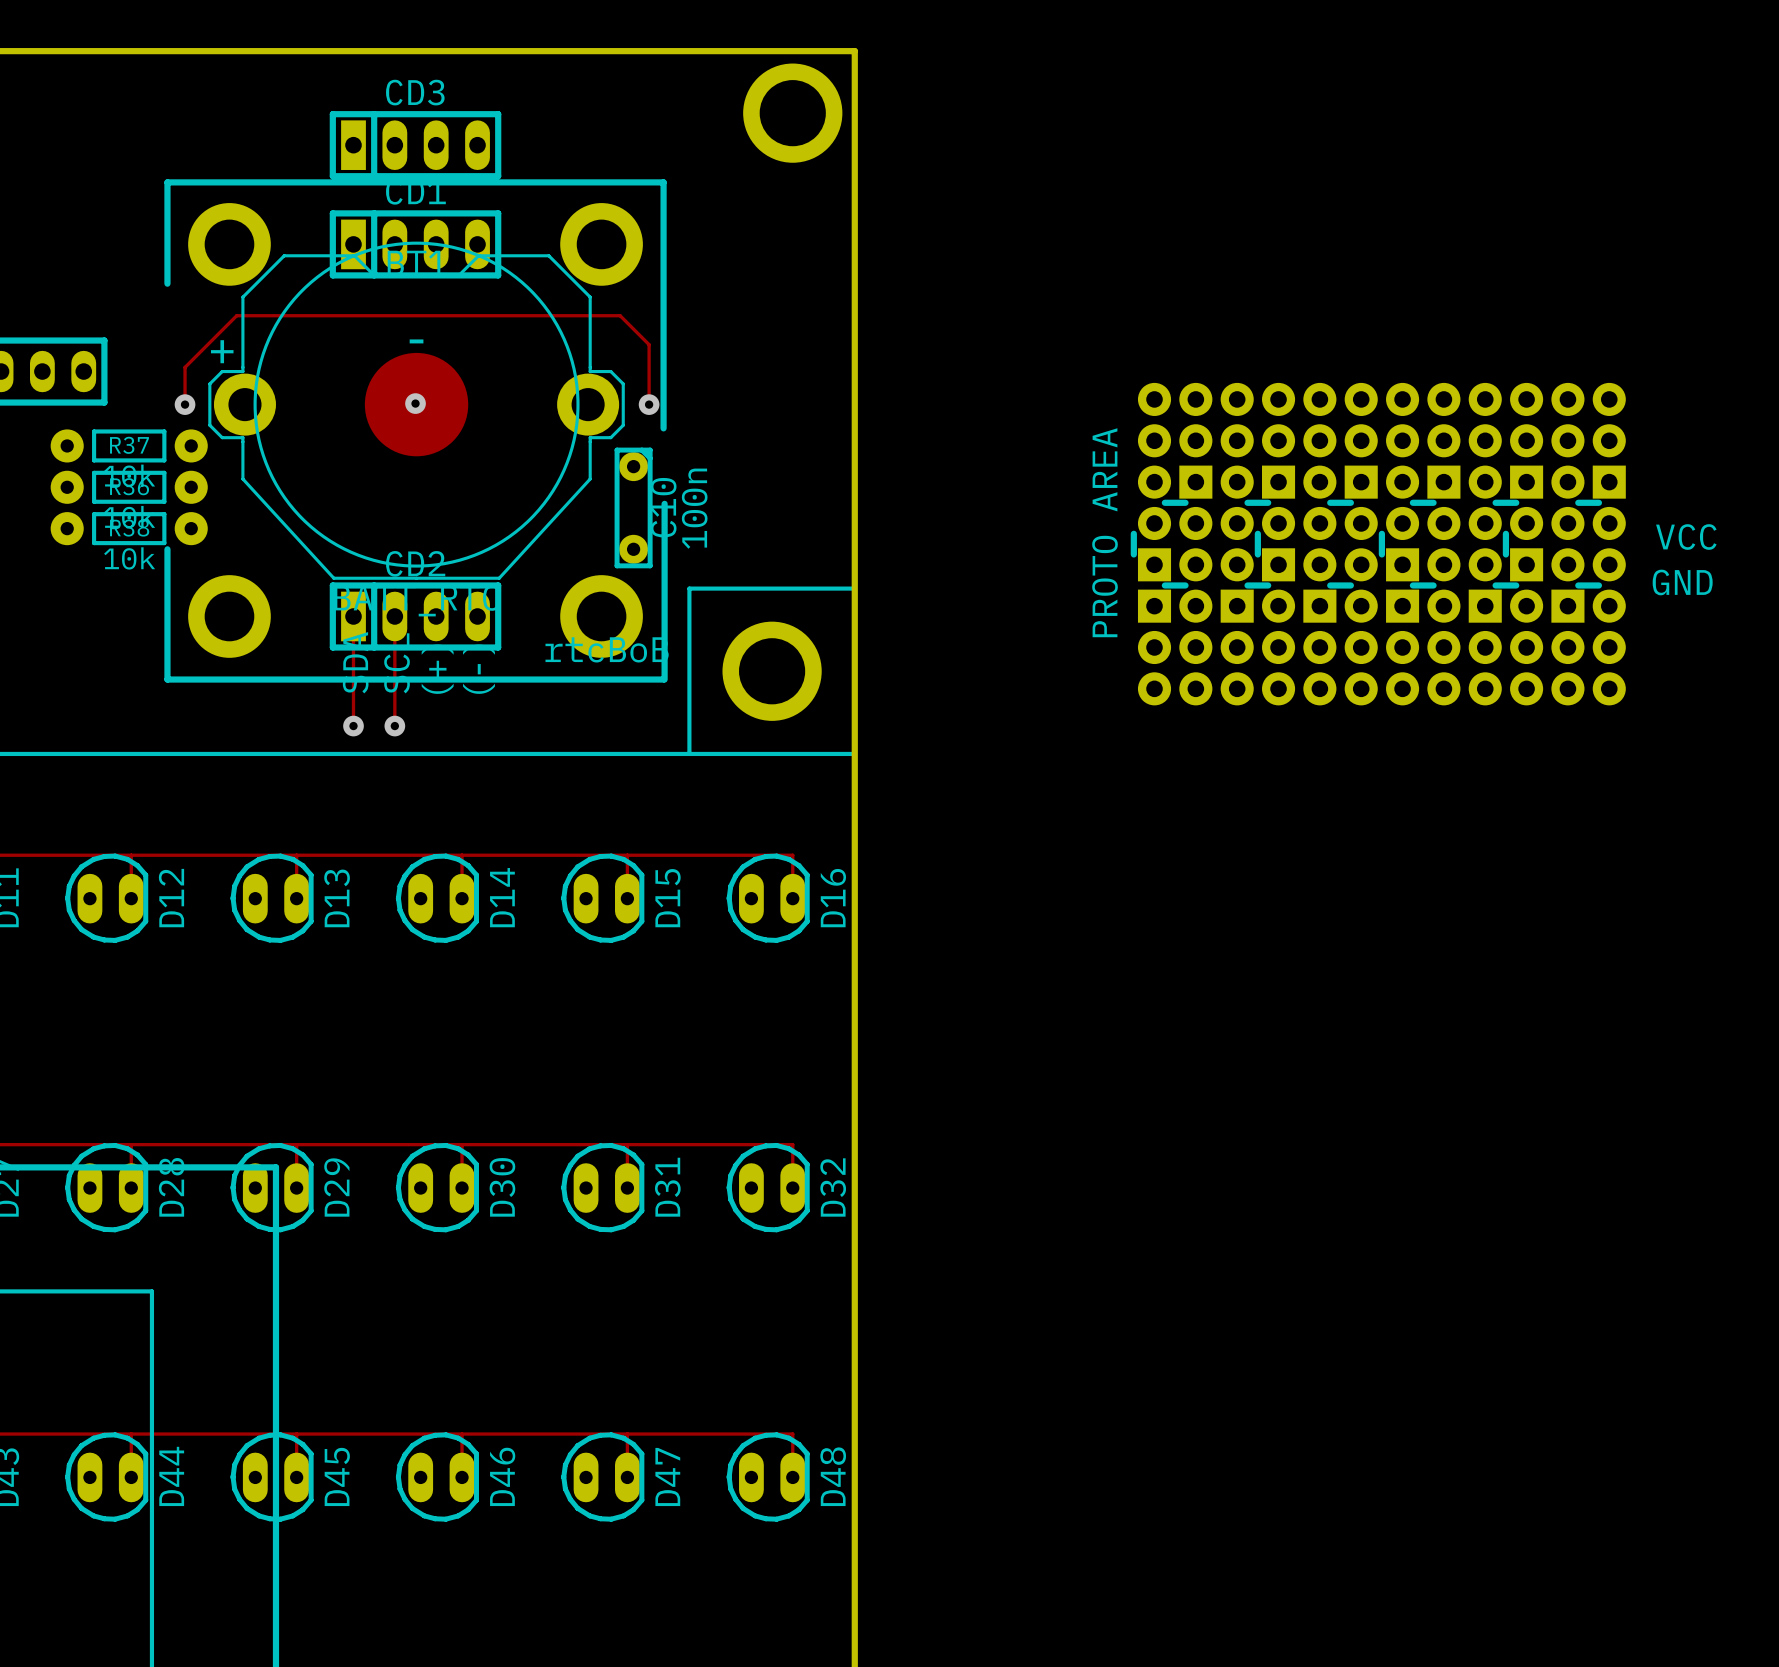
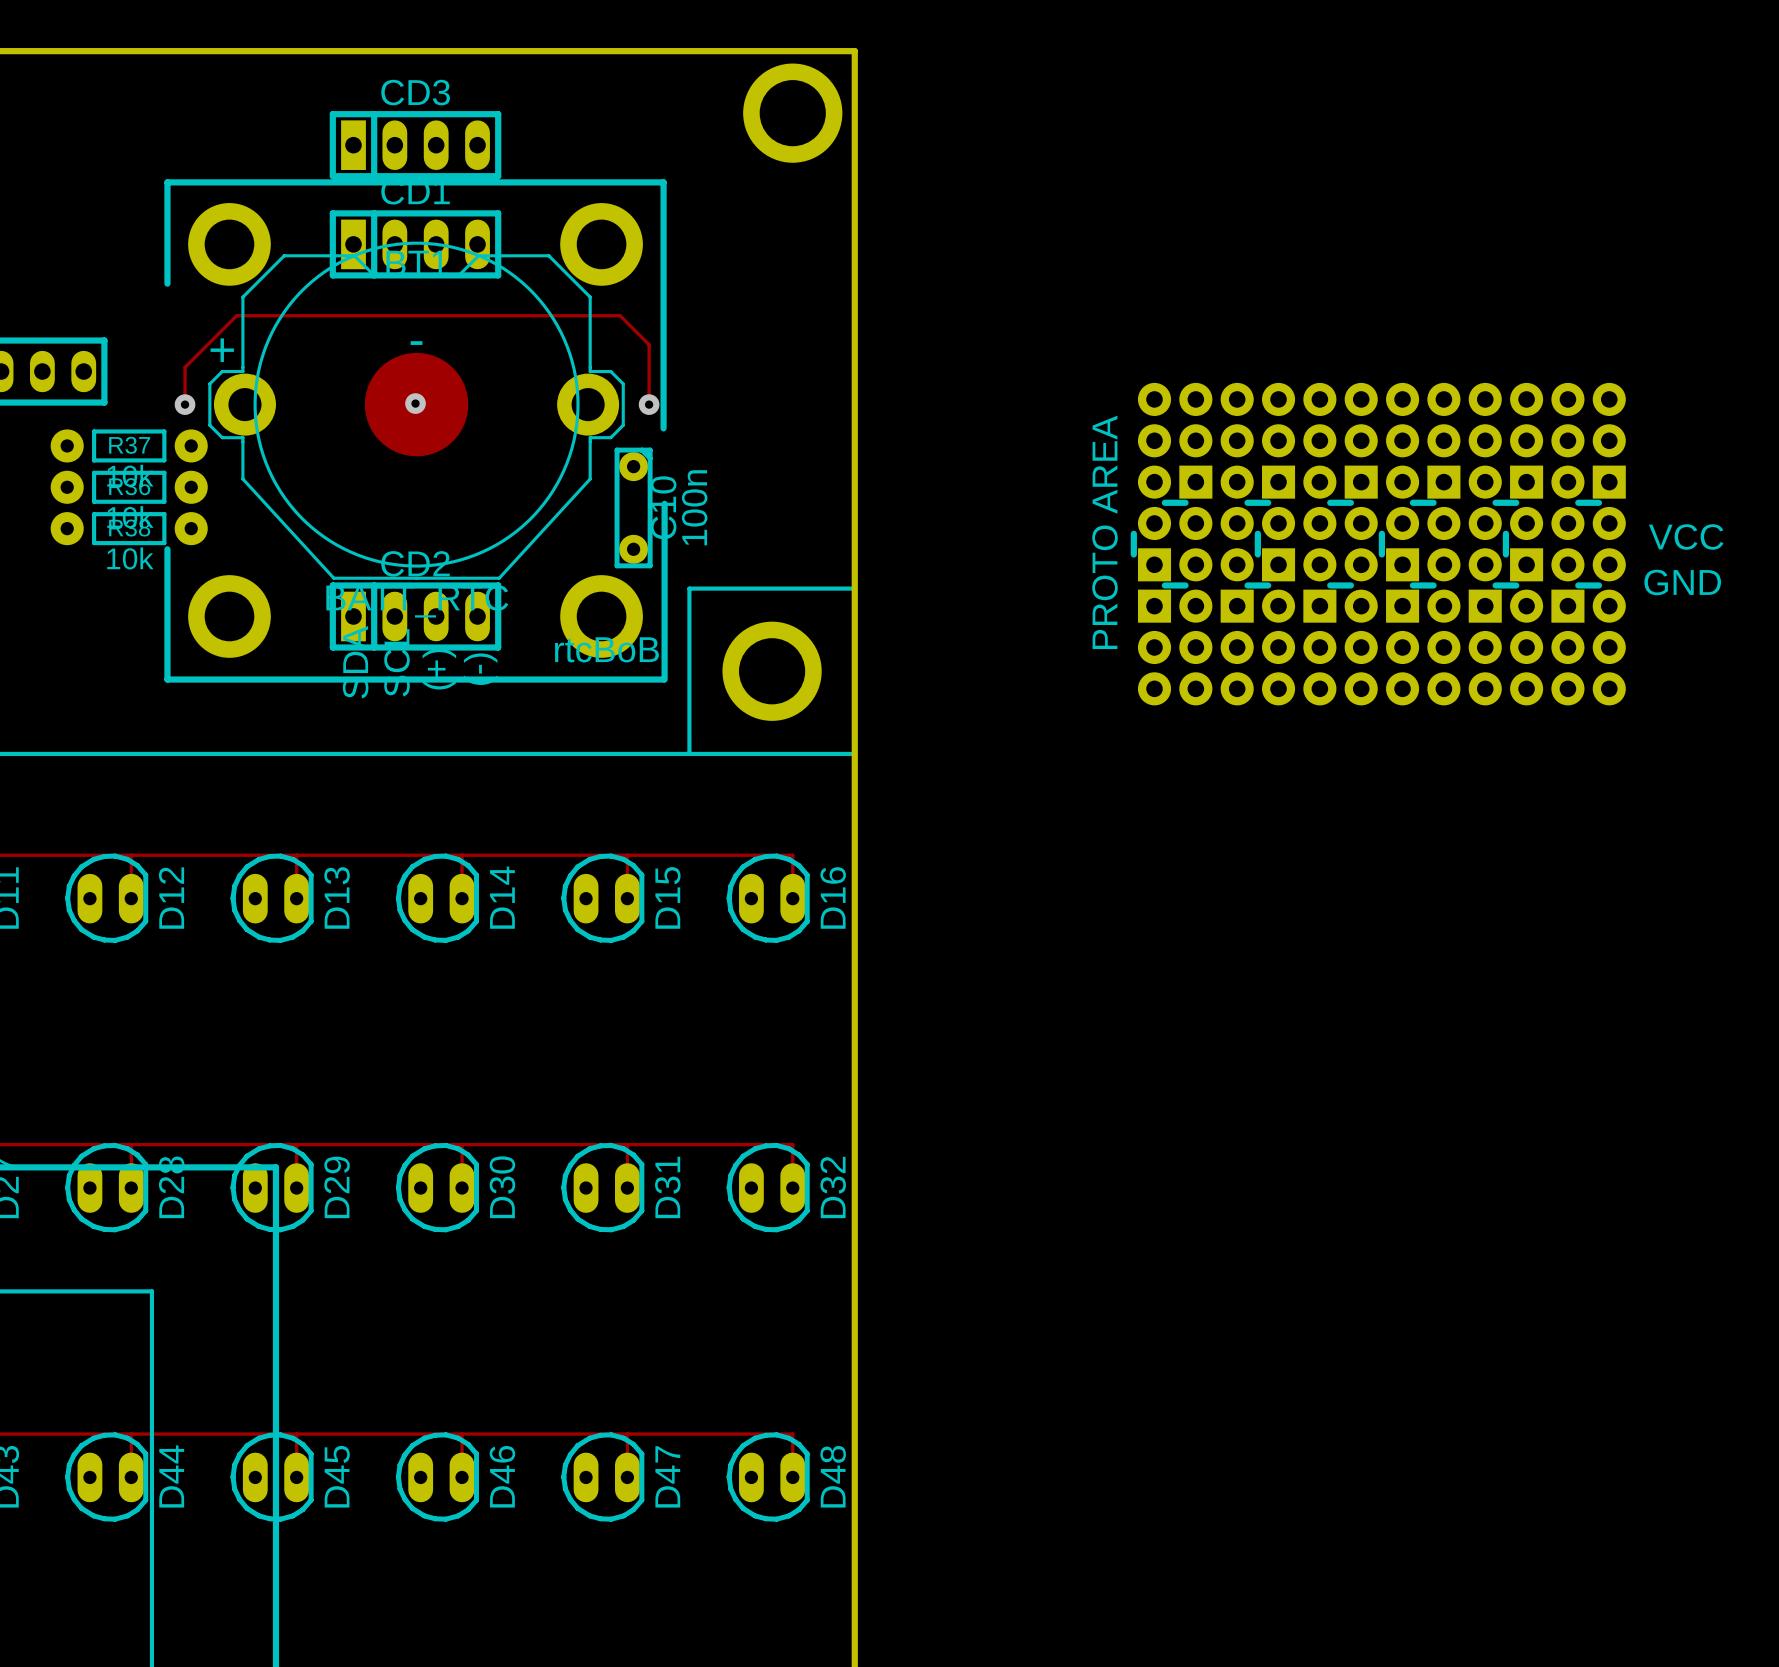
track: (353, 616) (353, 726) -> none
track: (394, 616) (394, 726) -> none
via: (353, 726) -> none
via: (394, 726) -> none

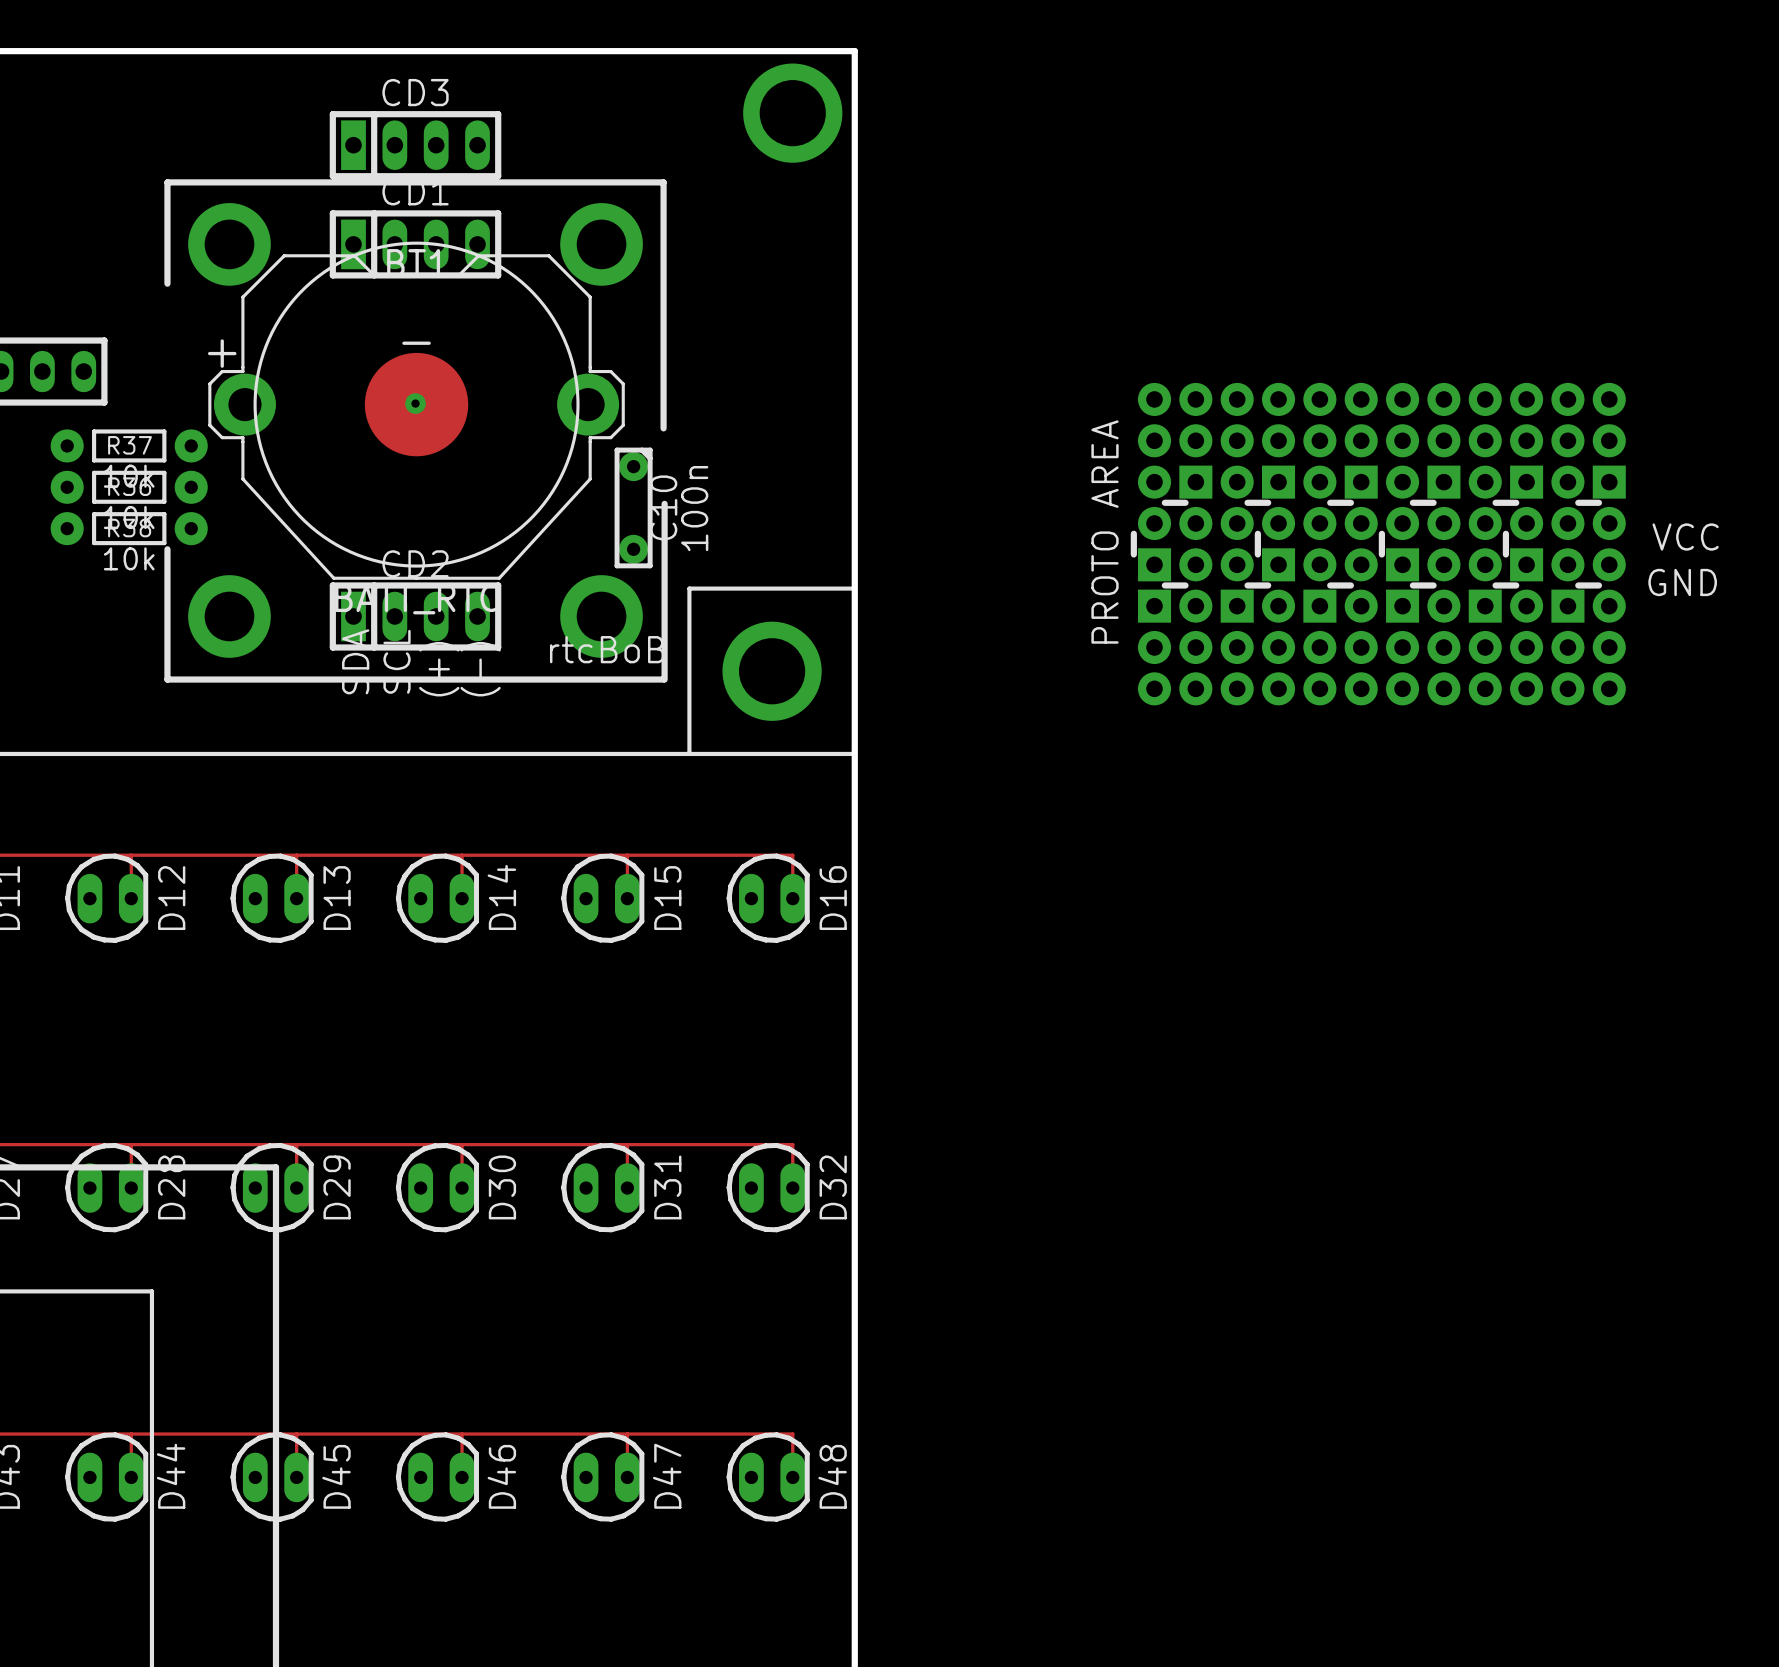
track: (185, 404) (185, 367) (236, 315) (620, 315) (649, 344) (649, 404) -> none
via: (185, 404) -> none
via: (649, 404) -> none

